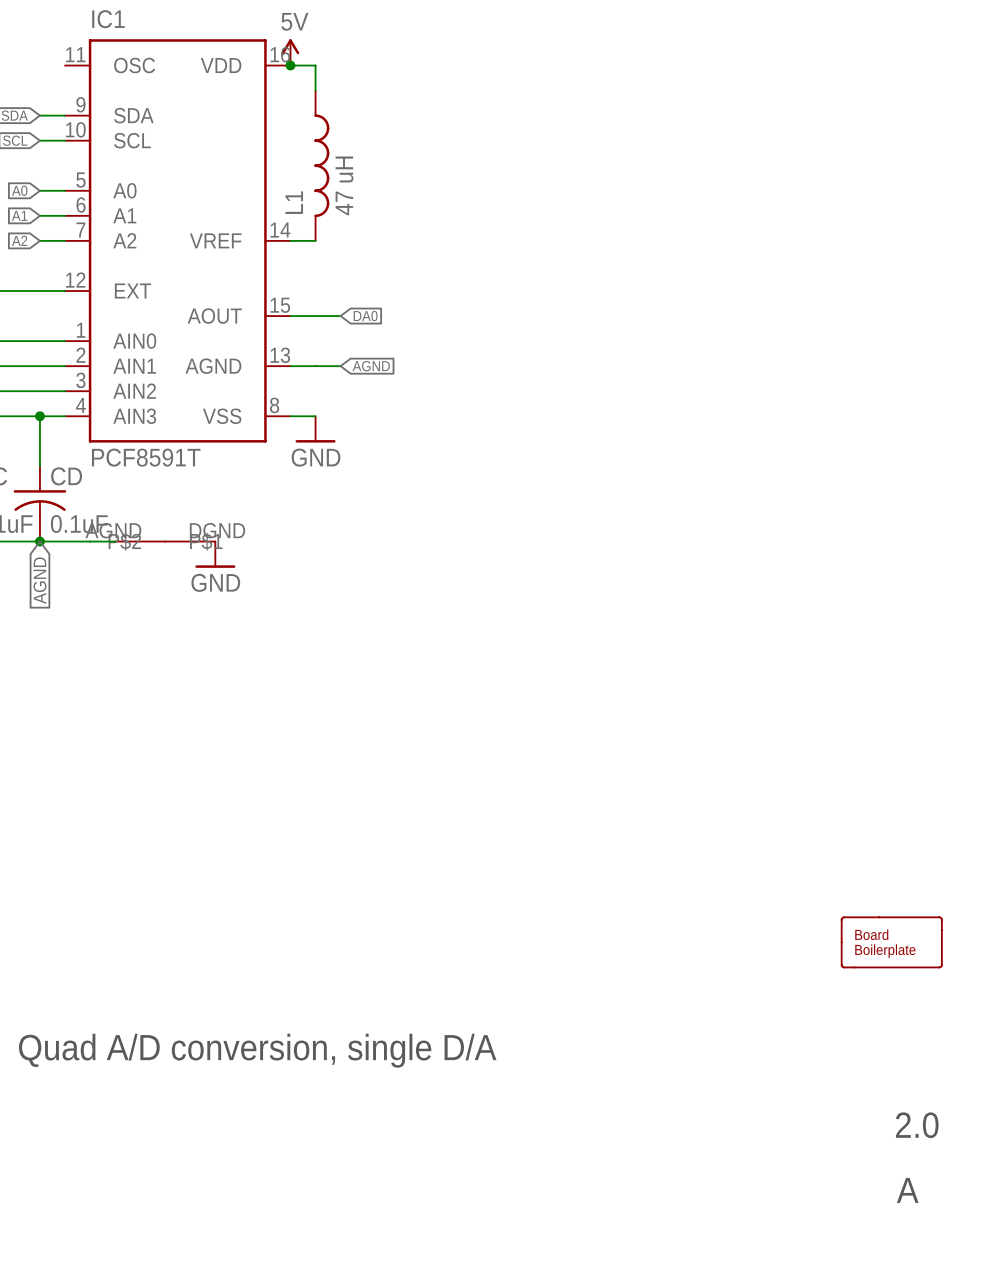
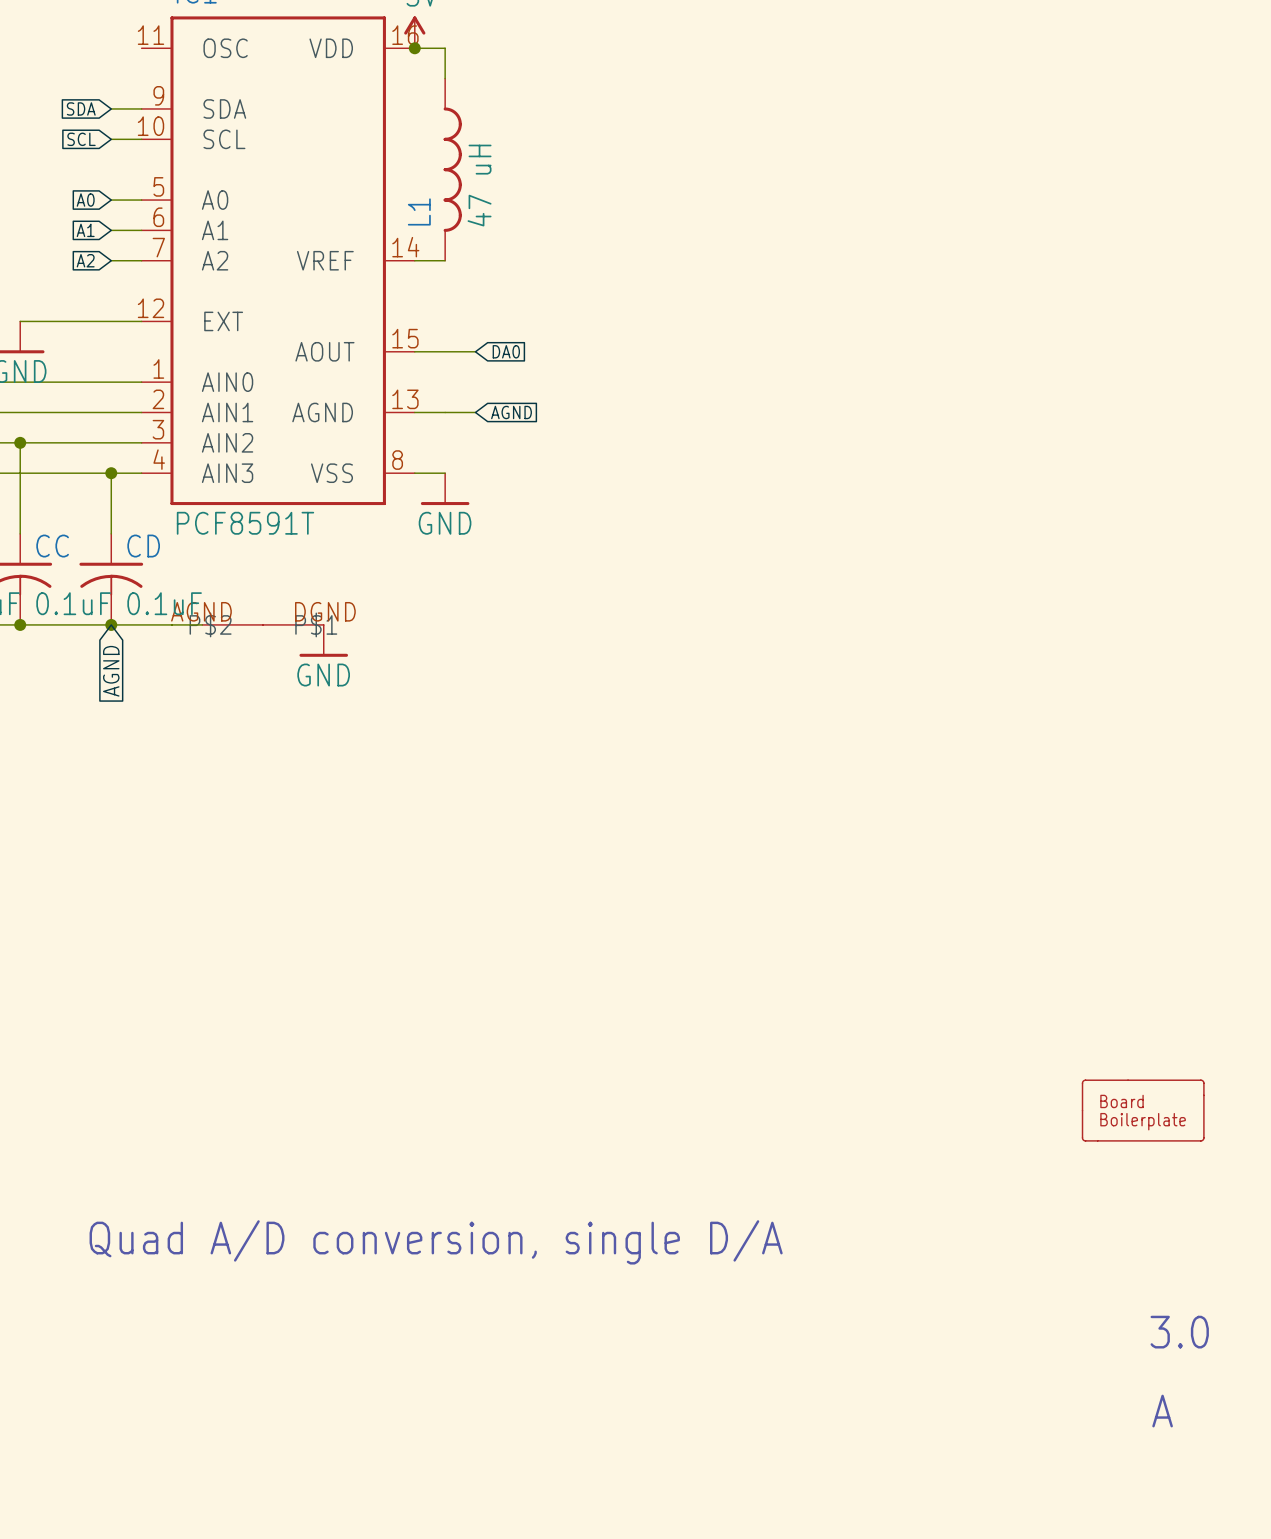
text: 2.0 (917, 1125) -> 3.0 (1179, 1332)

